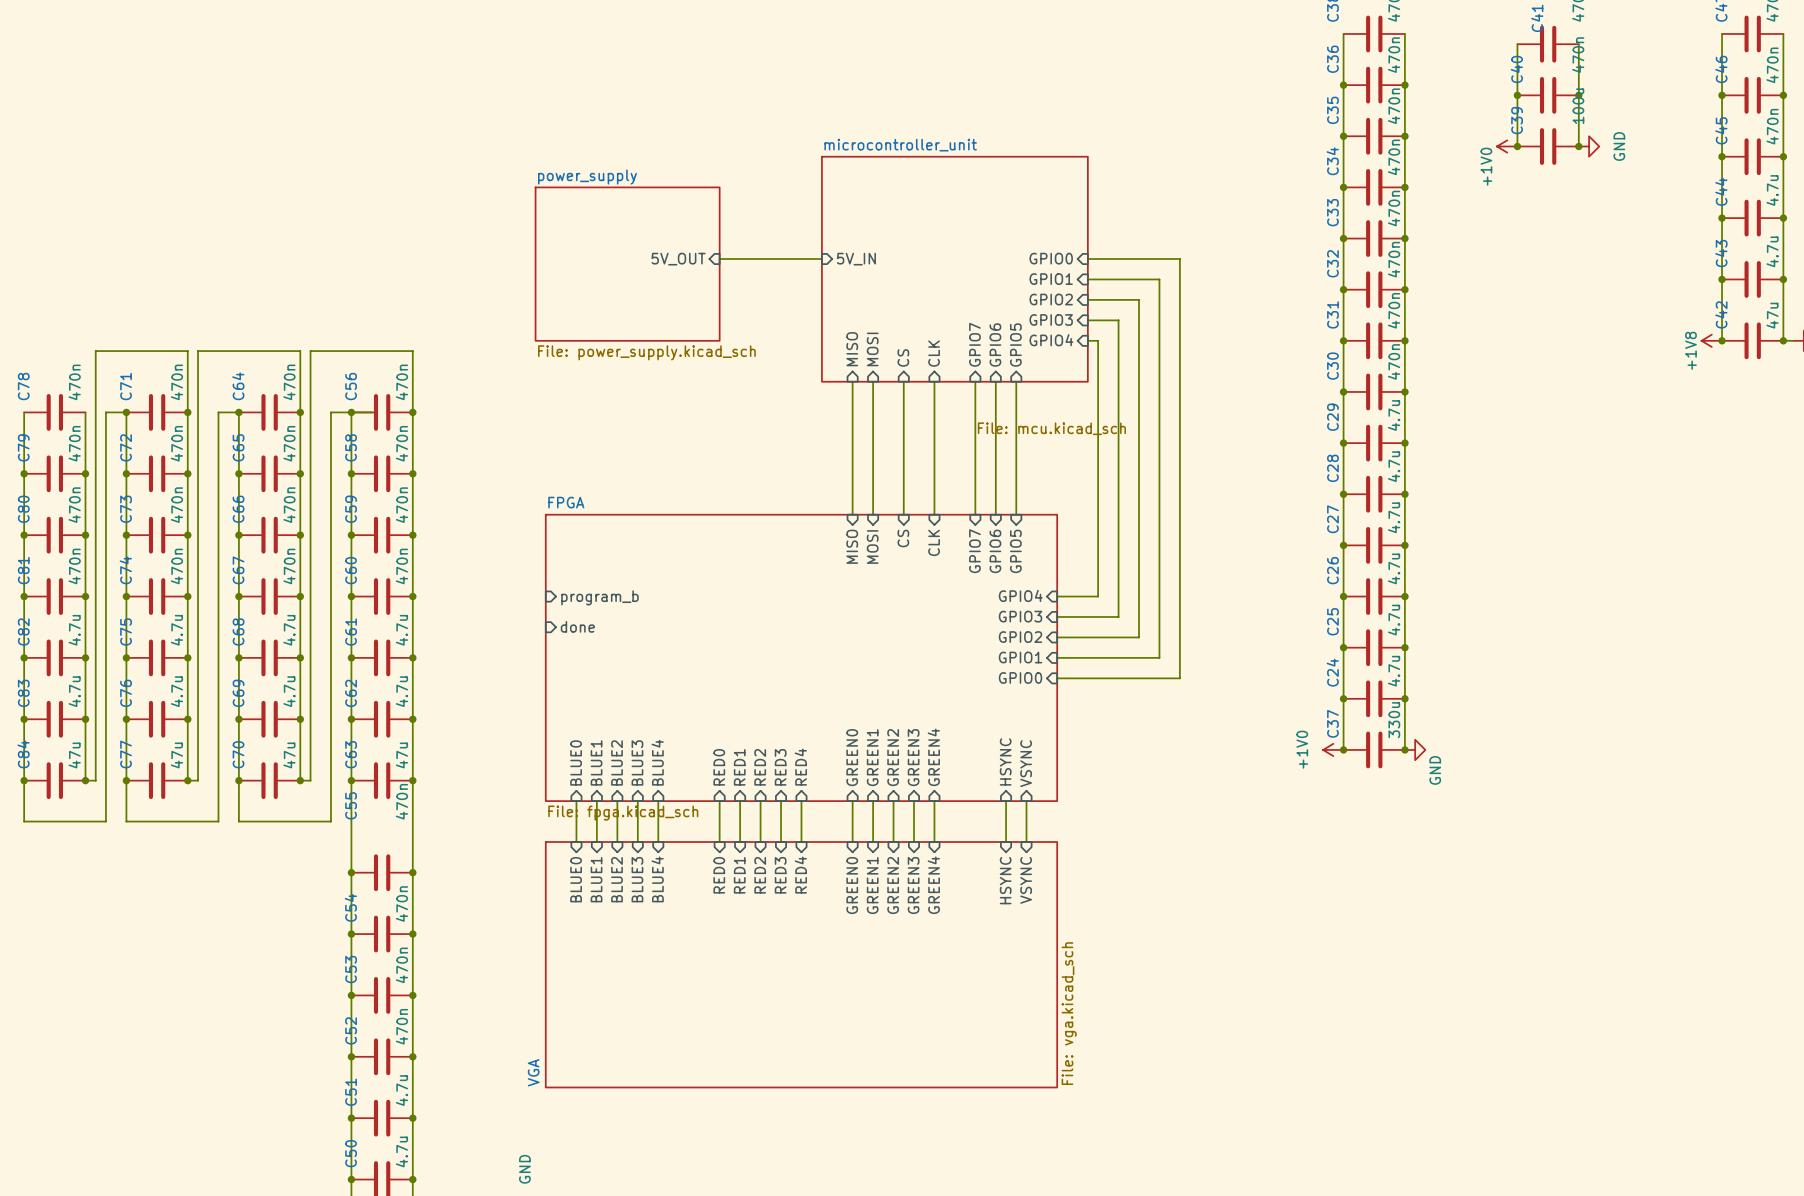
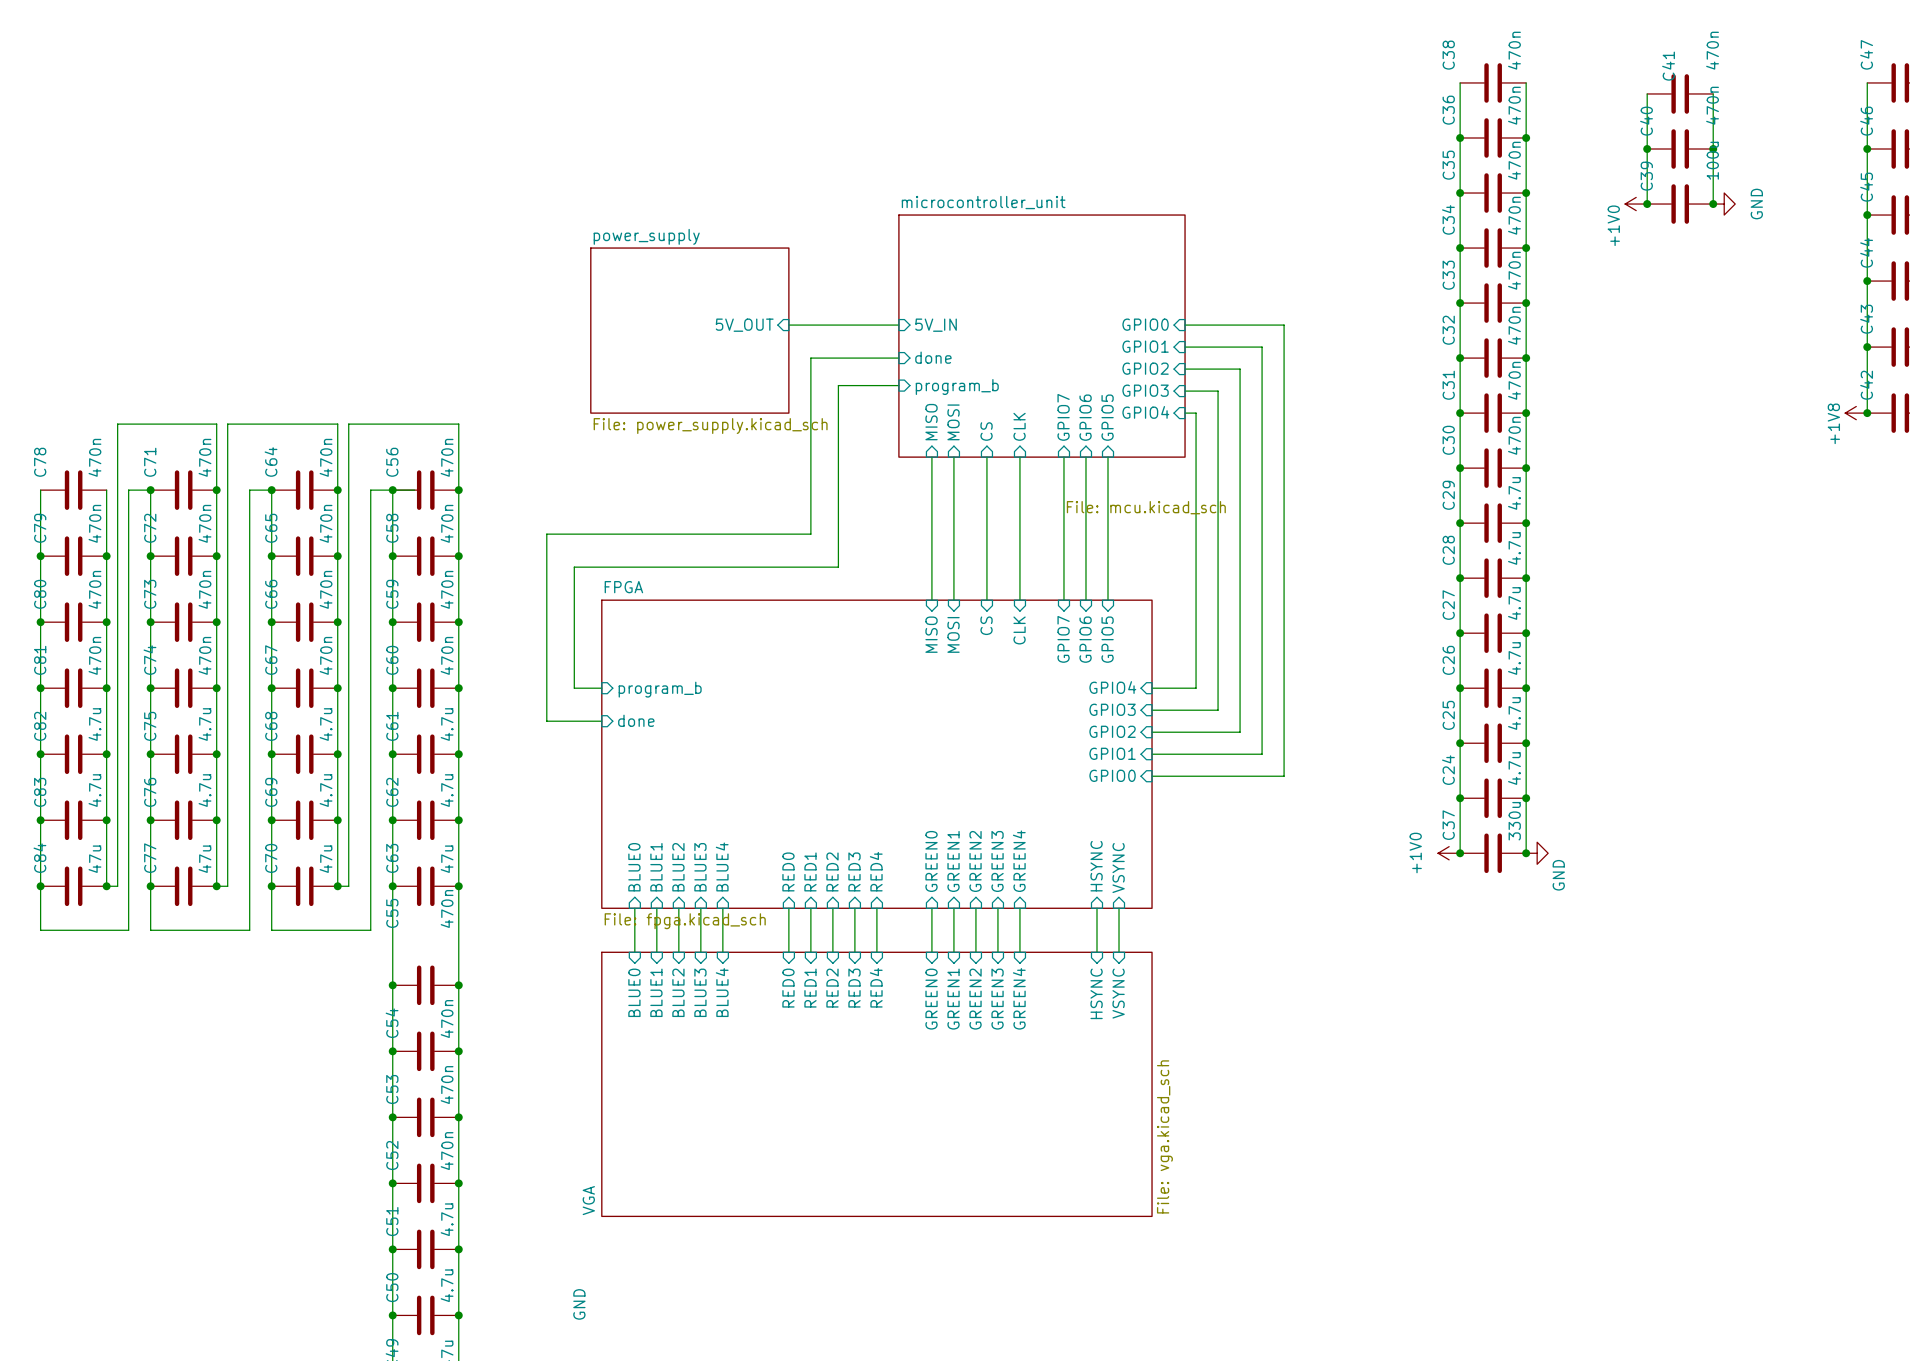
wire: none -> (898, 358) (810, 358) (810, 534) (546, 534) (546, 721) (601, 721)
sheet pin: none -> done (933, 357)
wire: none -> (898, 385) (838, 385) (838, 567) (574, 567) (574, 688) (601, 688)
sheet pin: none -> program_b (957, 387)

